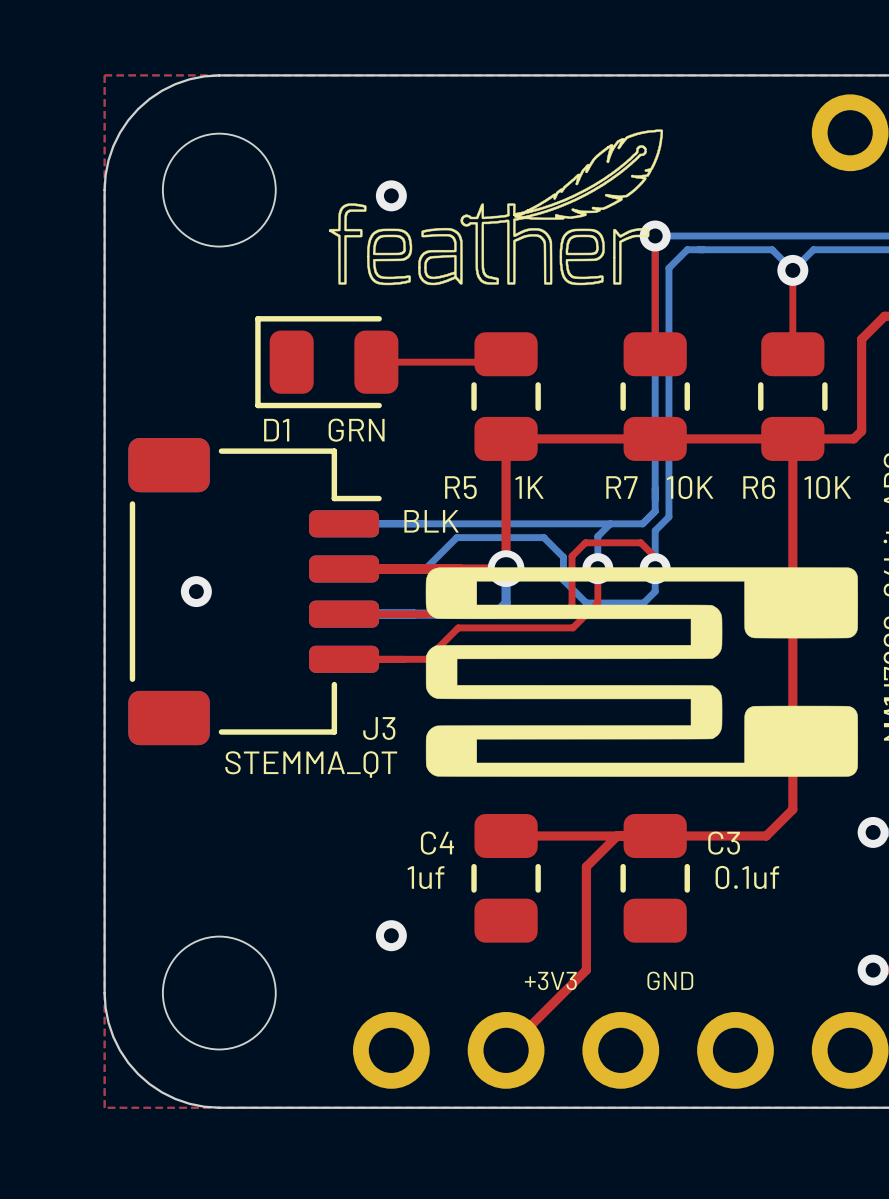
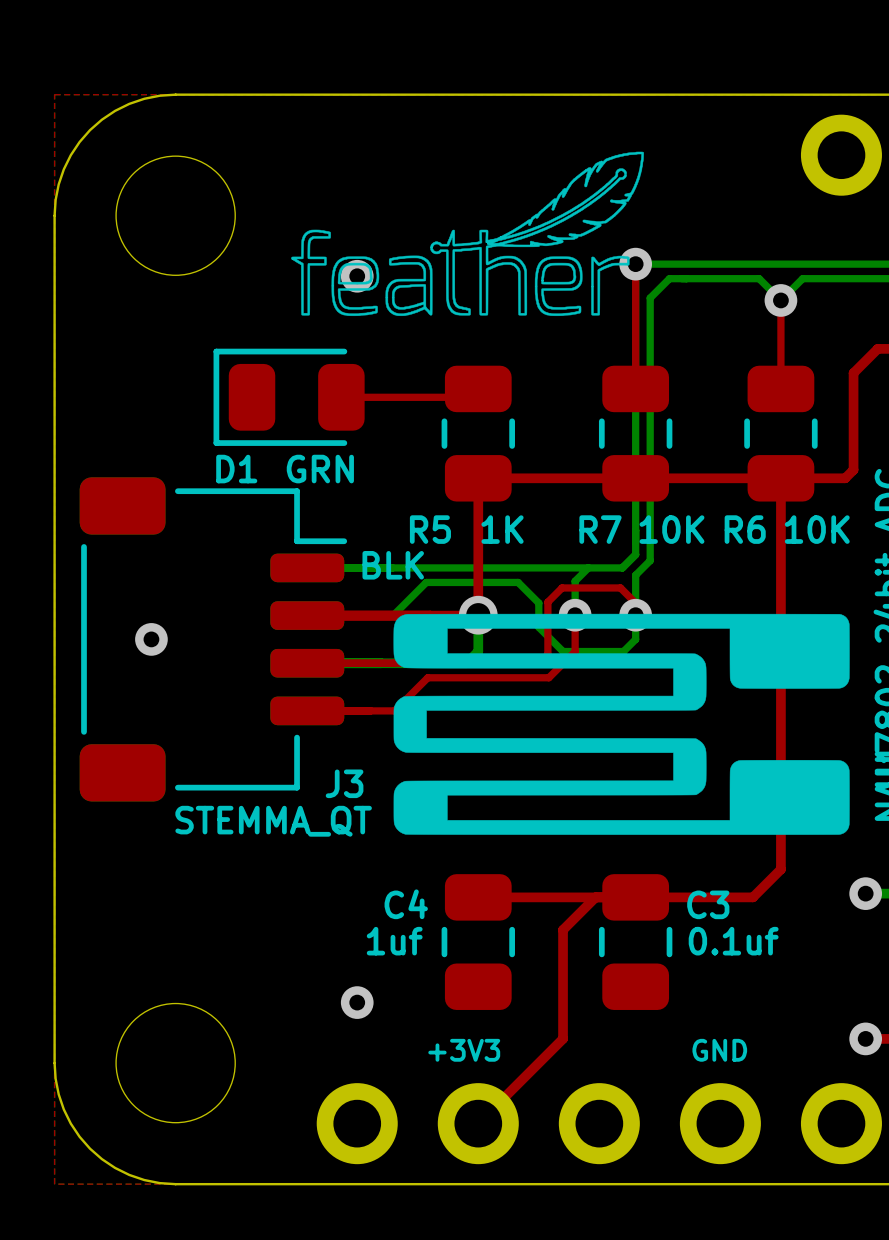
via position: (391, 195) -> (357, 276)

